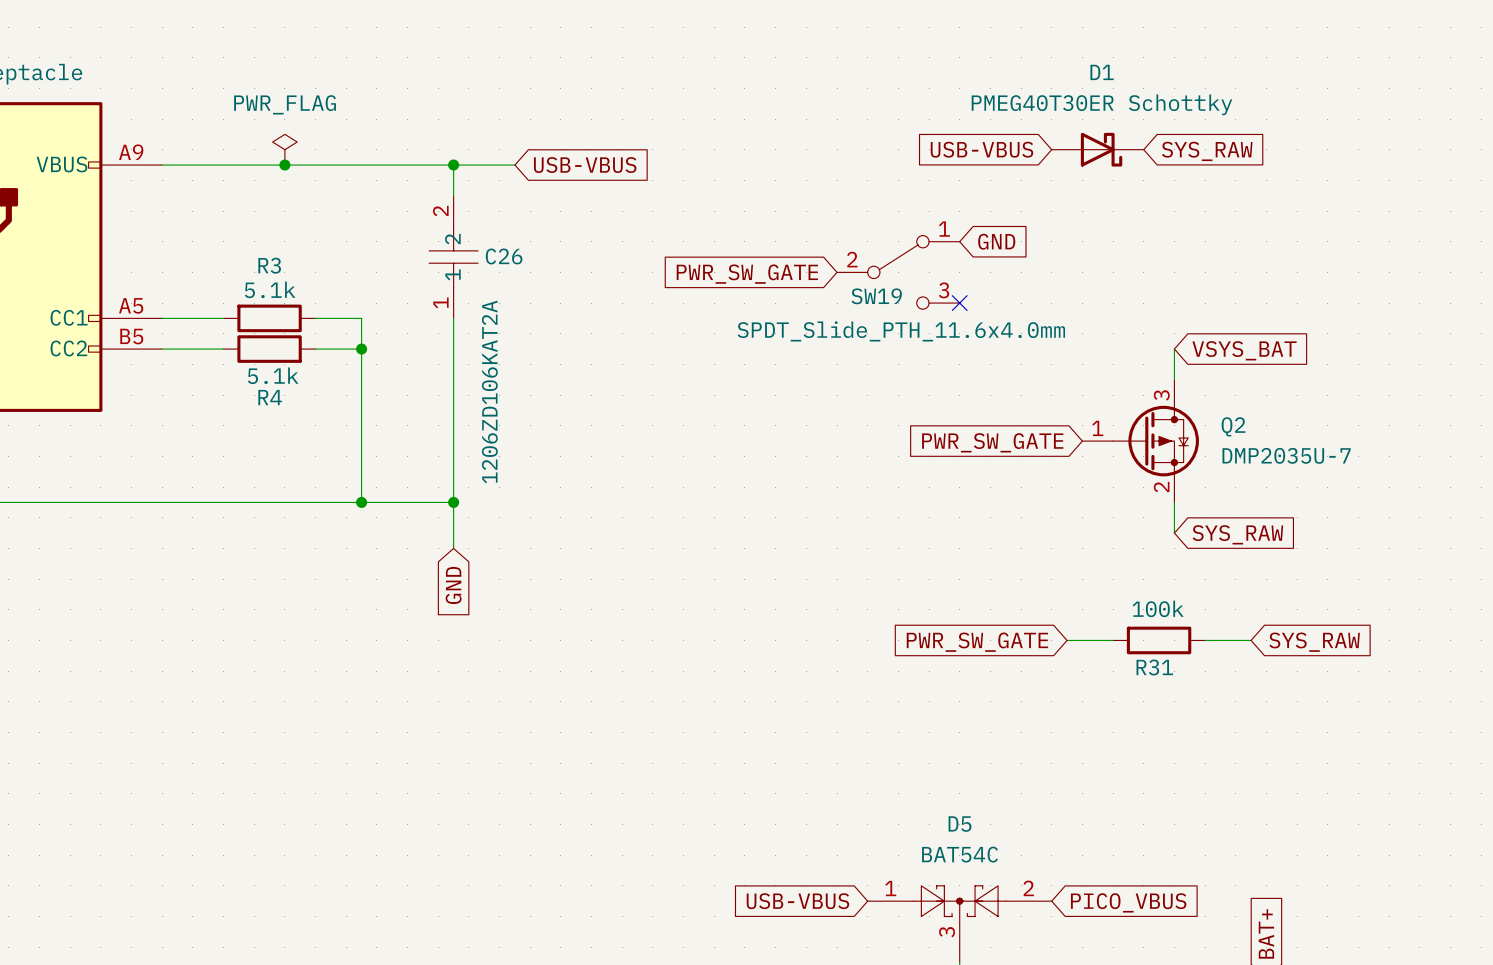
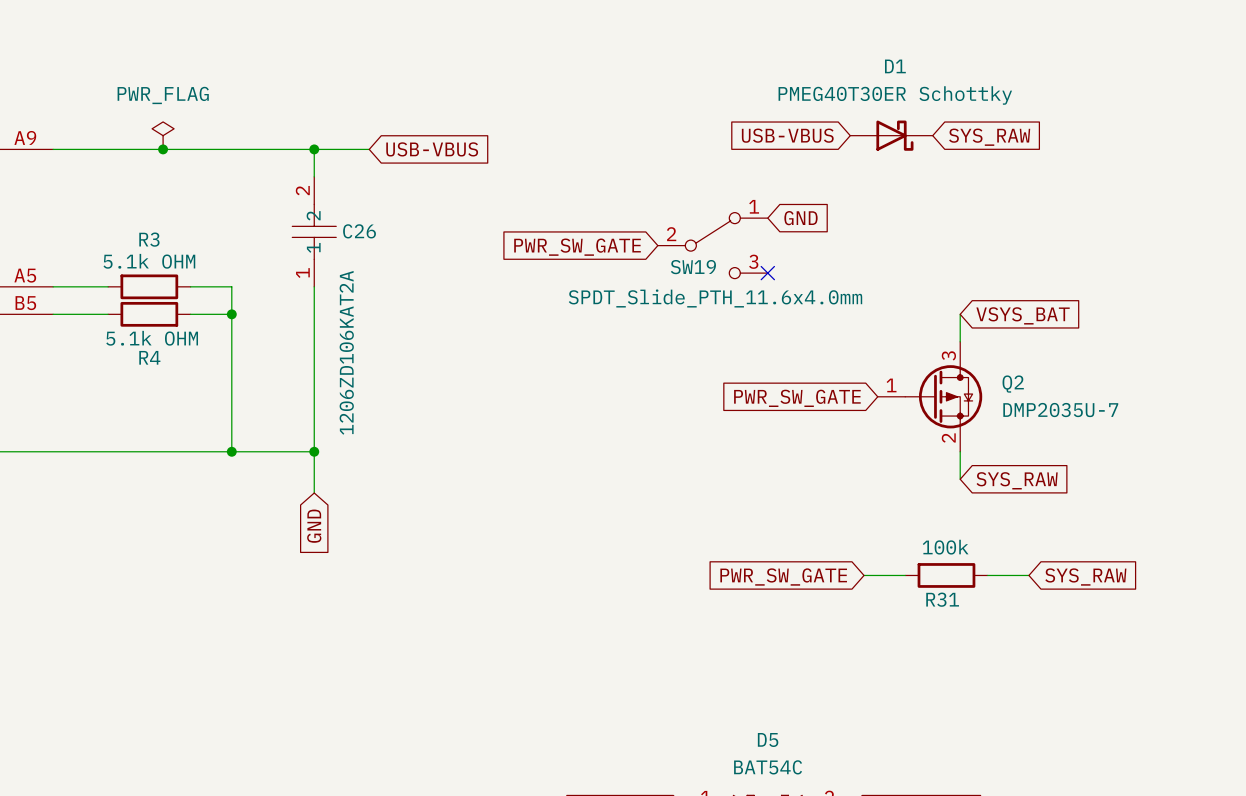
R3 value: 5.1k (270, 289) -> 5.1k OHM (149, 261)
R4 value: 5.1k (273, 375) -> 5.1k OHM (152, 338)

